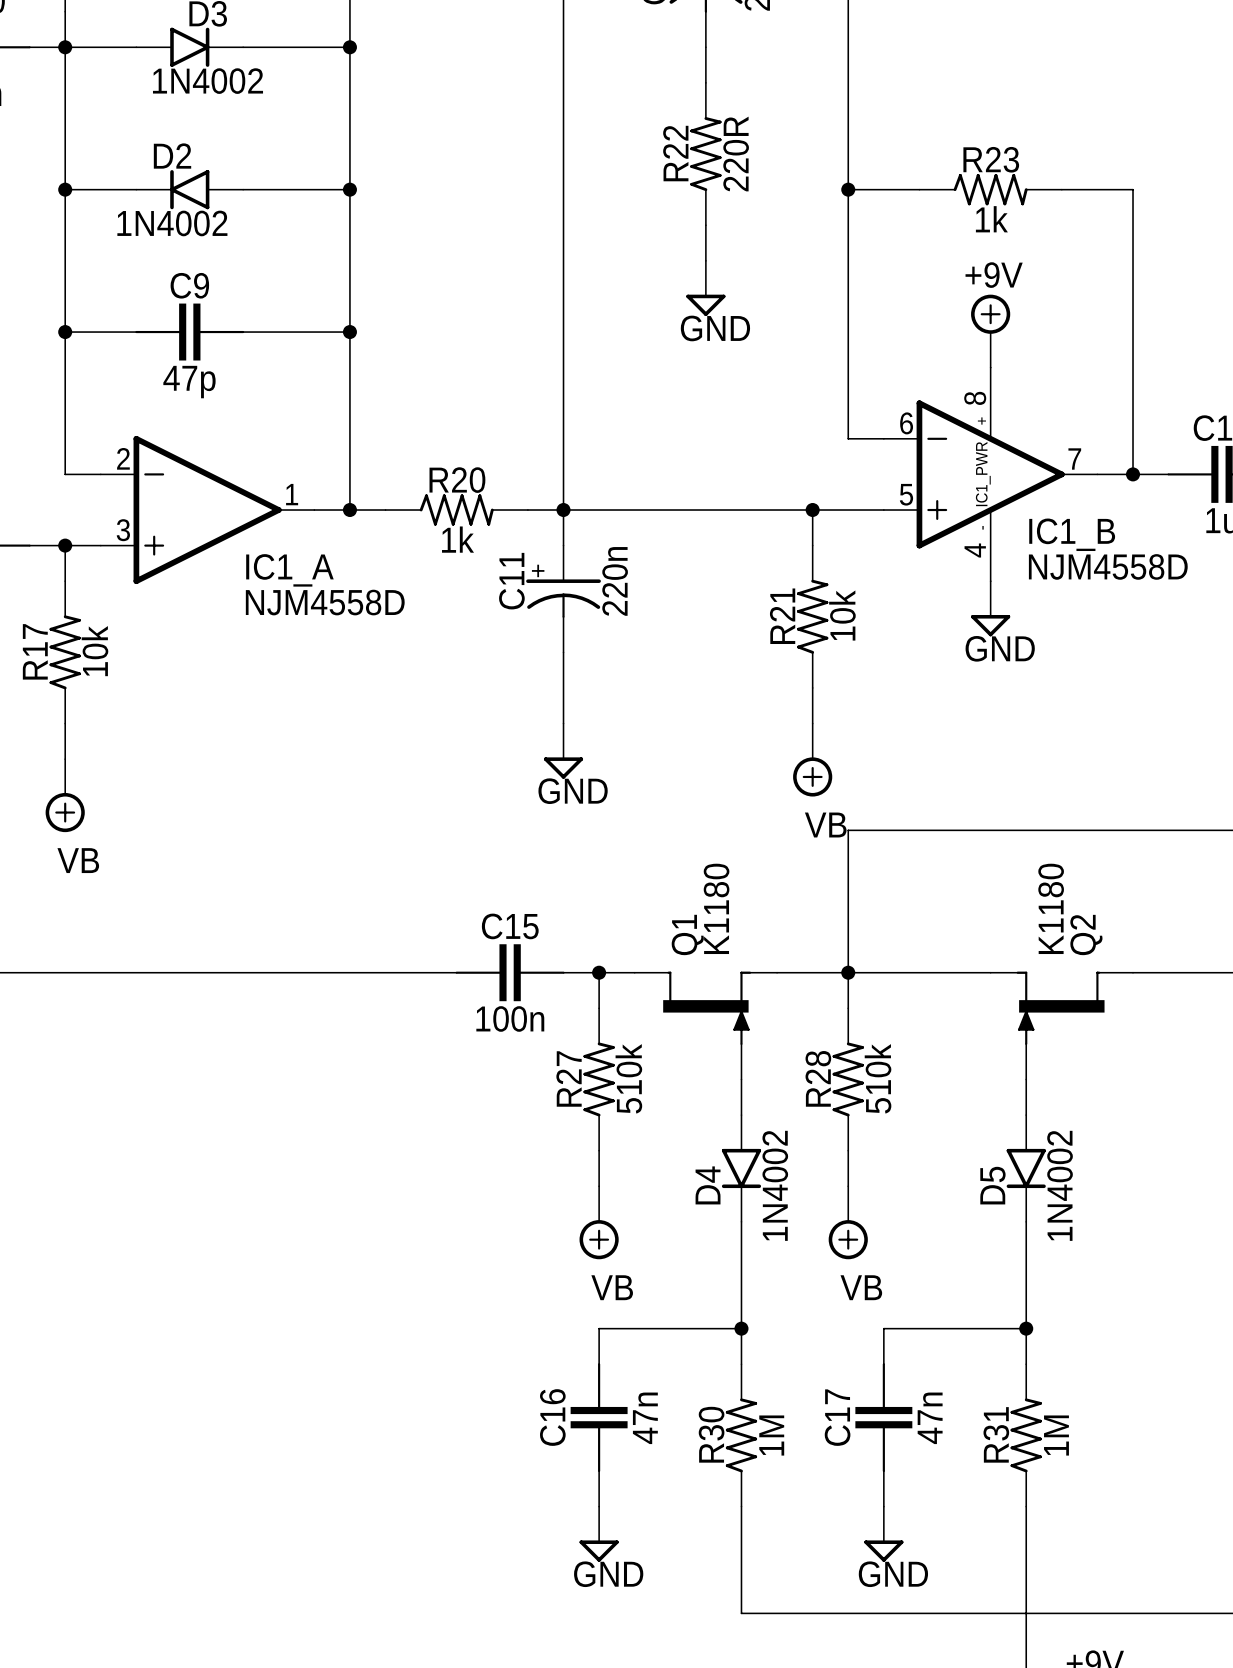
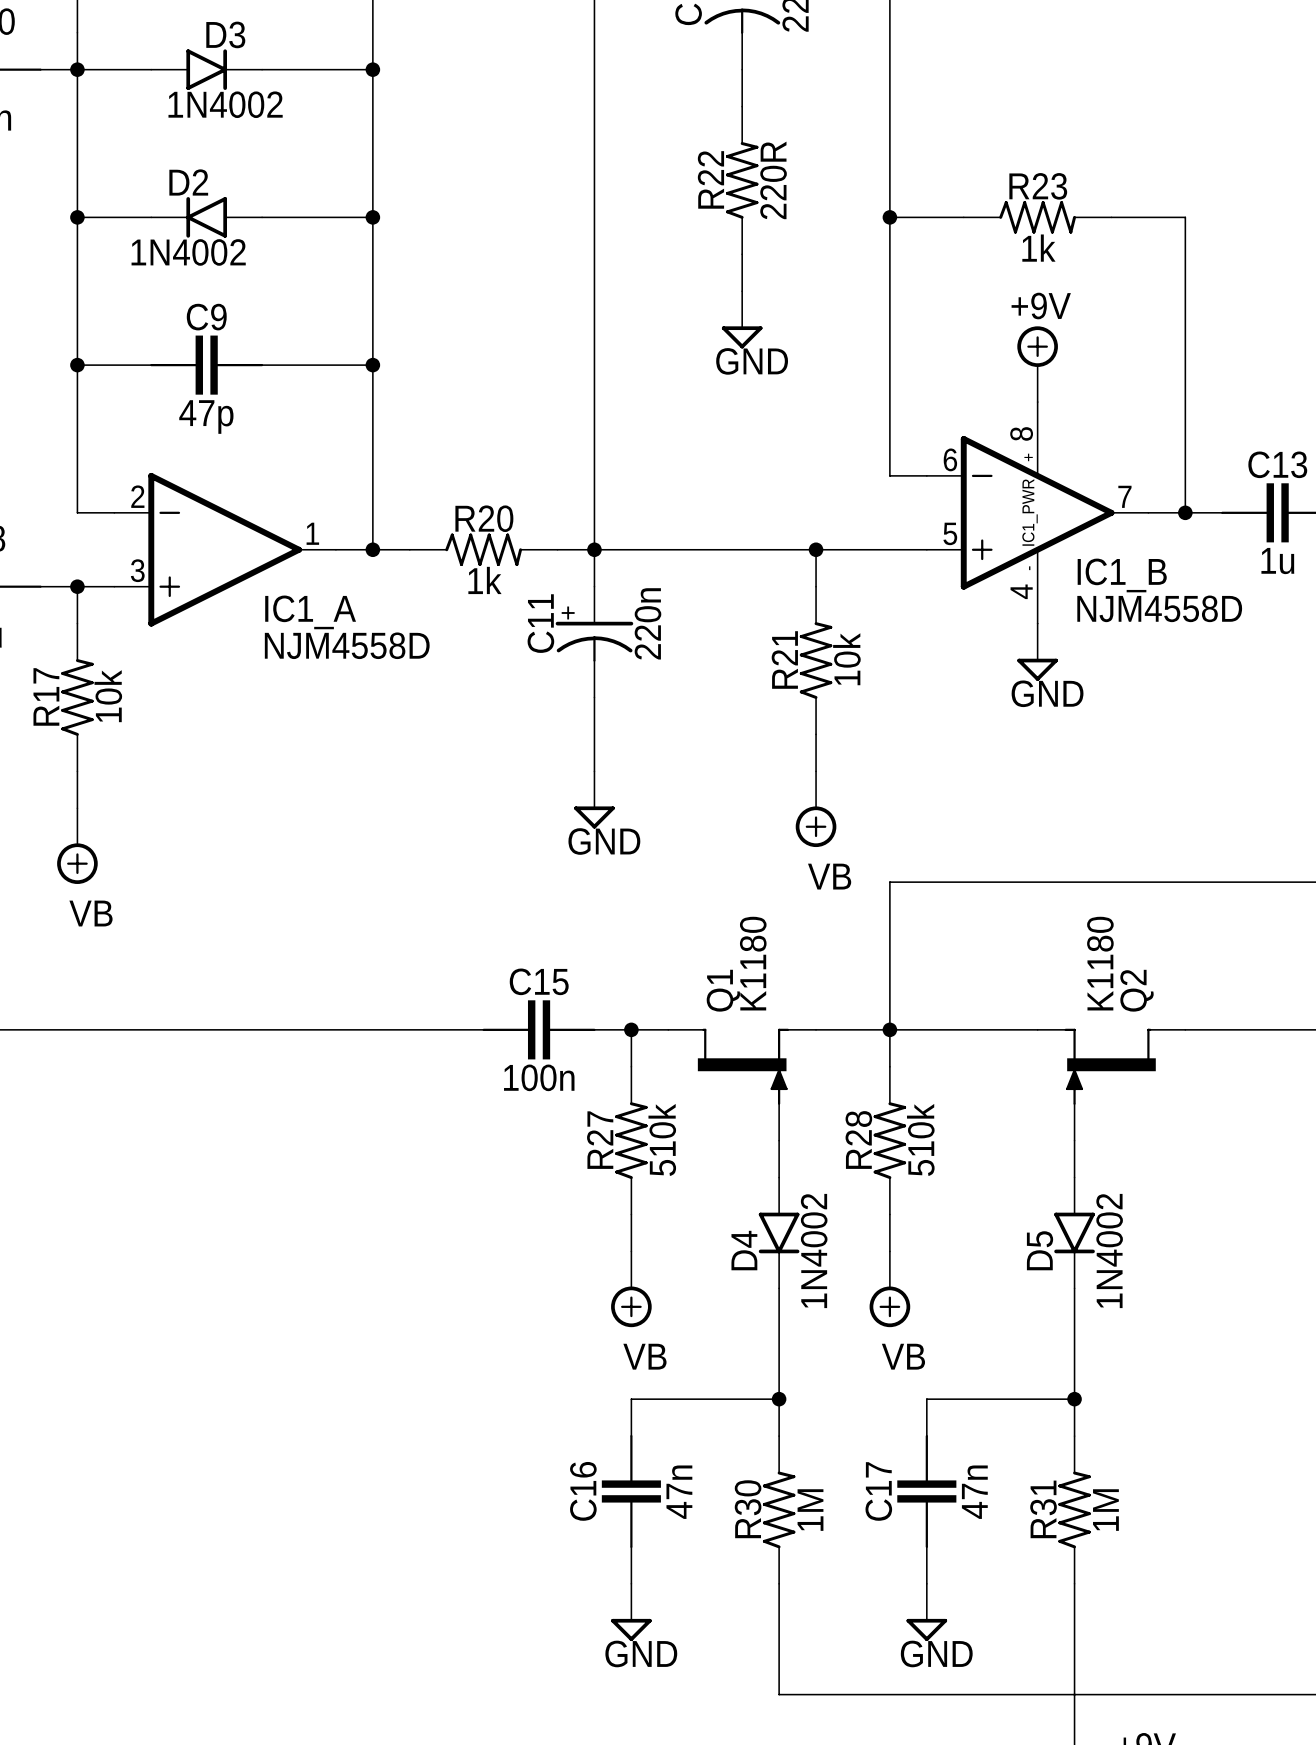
wire: (812, 510) (812, 545) -> (816, 549) (816, 586)
junction position: (812, 510) -> (816, 549)
R21 position: (812, 616) -> (816, 660)
wire: (812, 687) (812, 723) -> (816, 734) (816, 771)
power symbol position: VB (812, 760) -> VB (816, 809)

